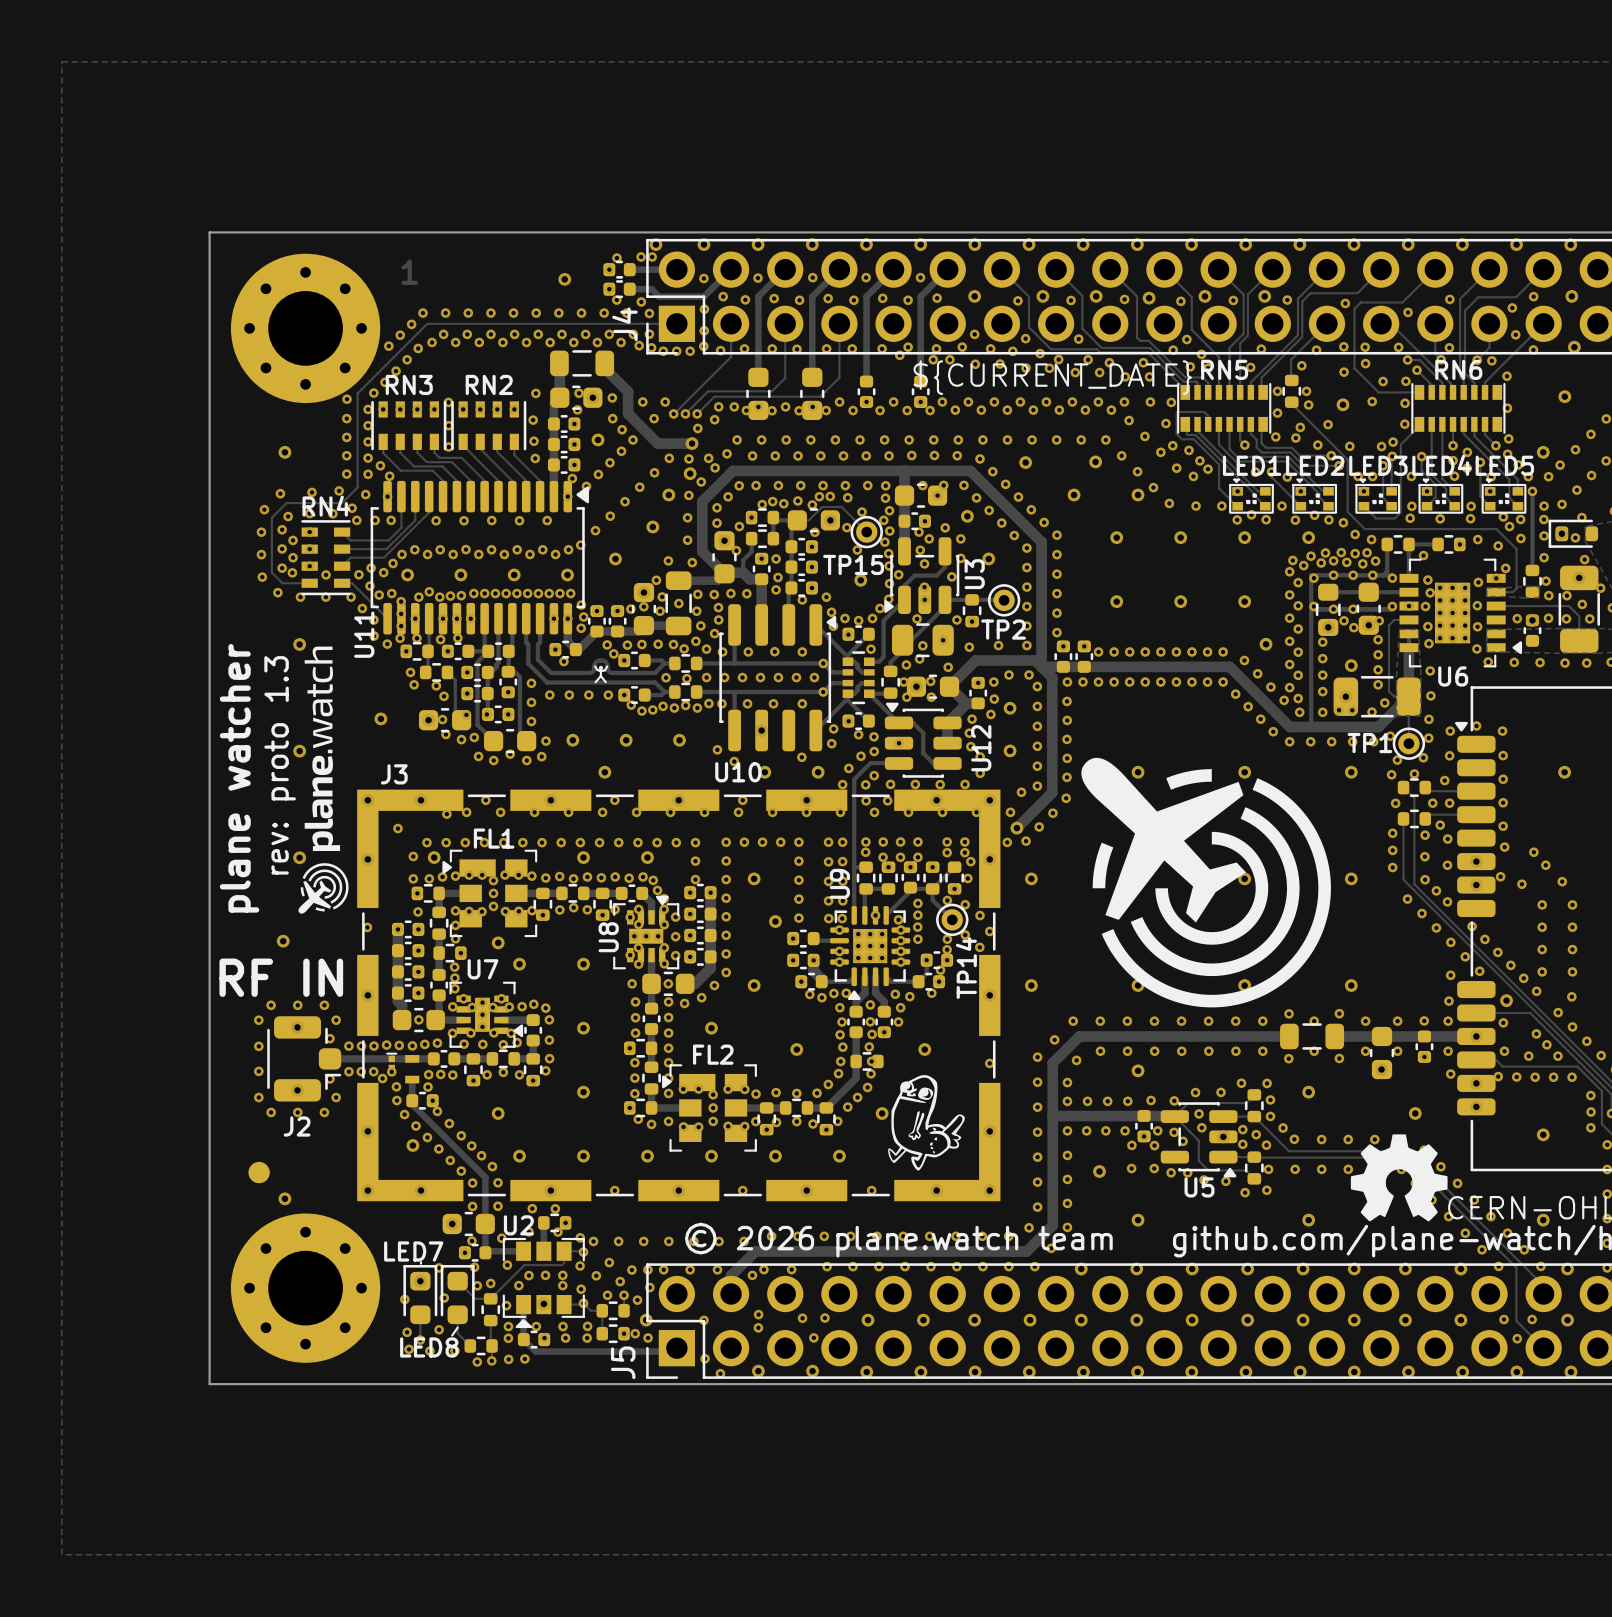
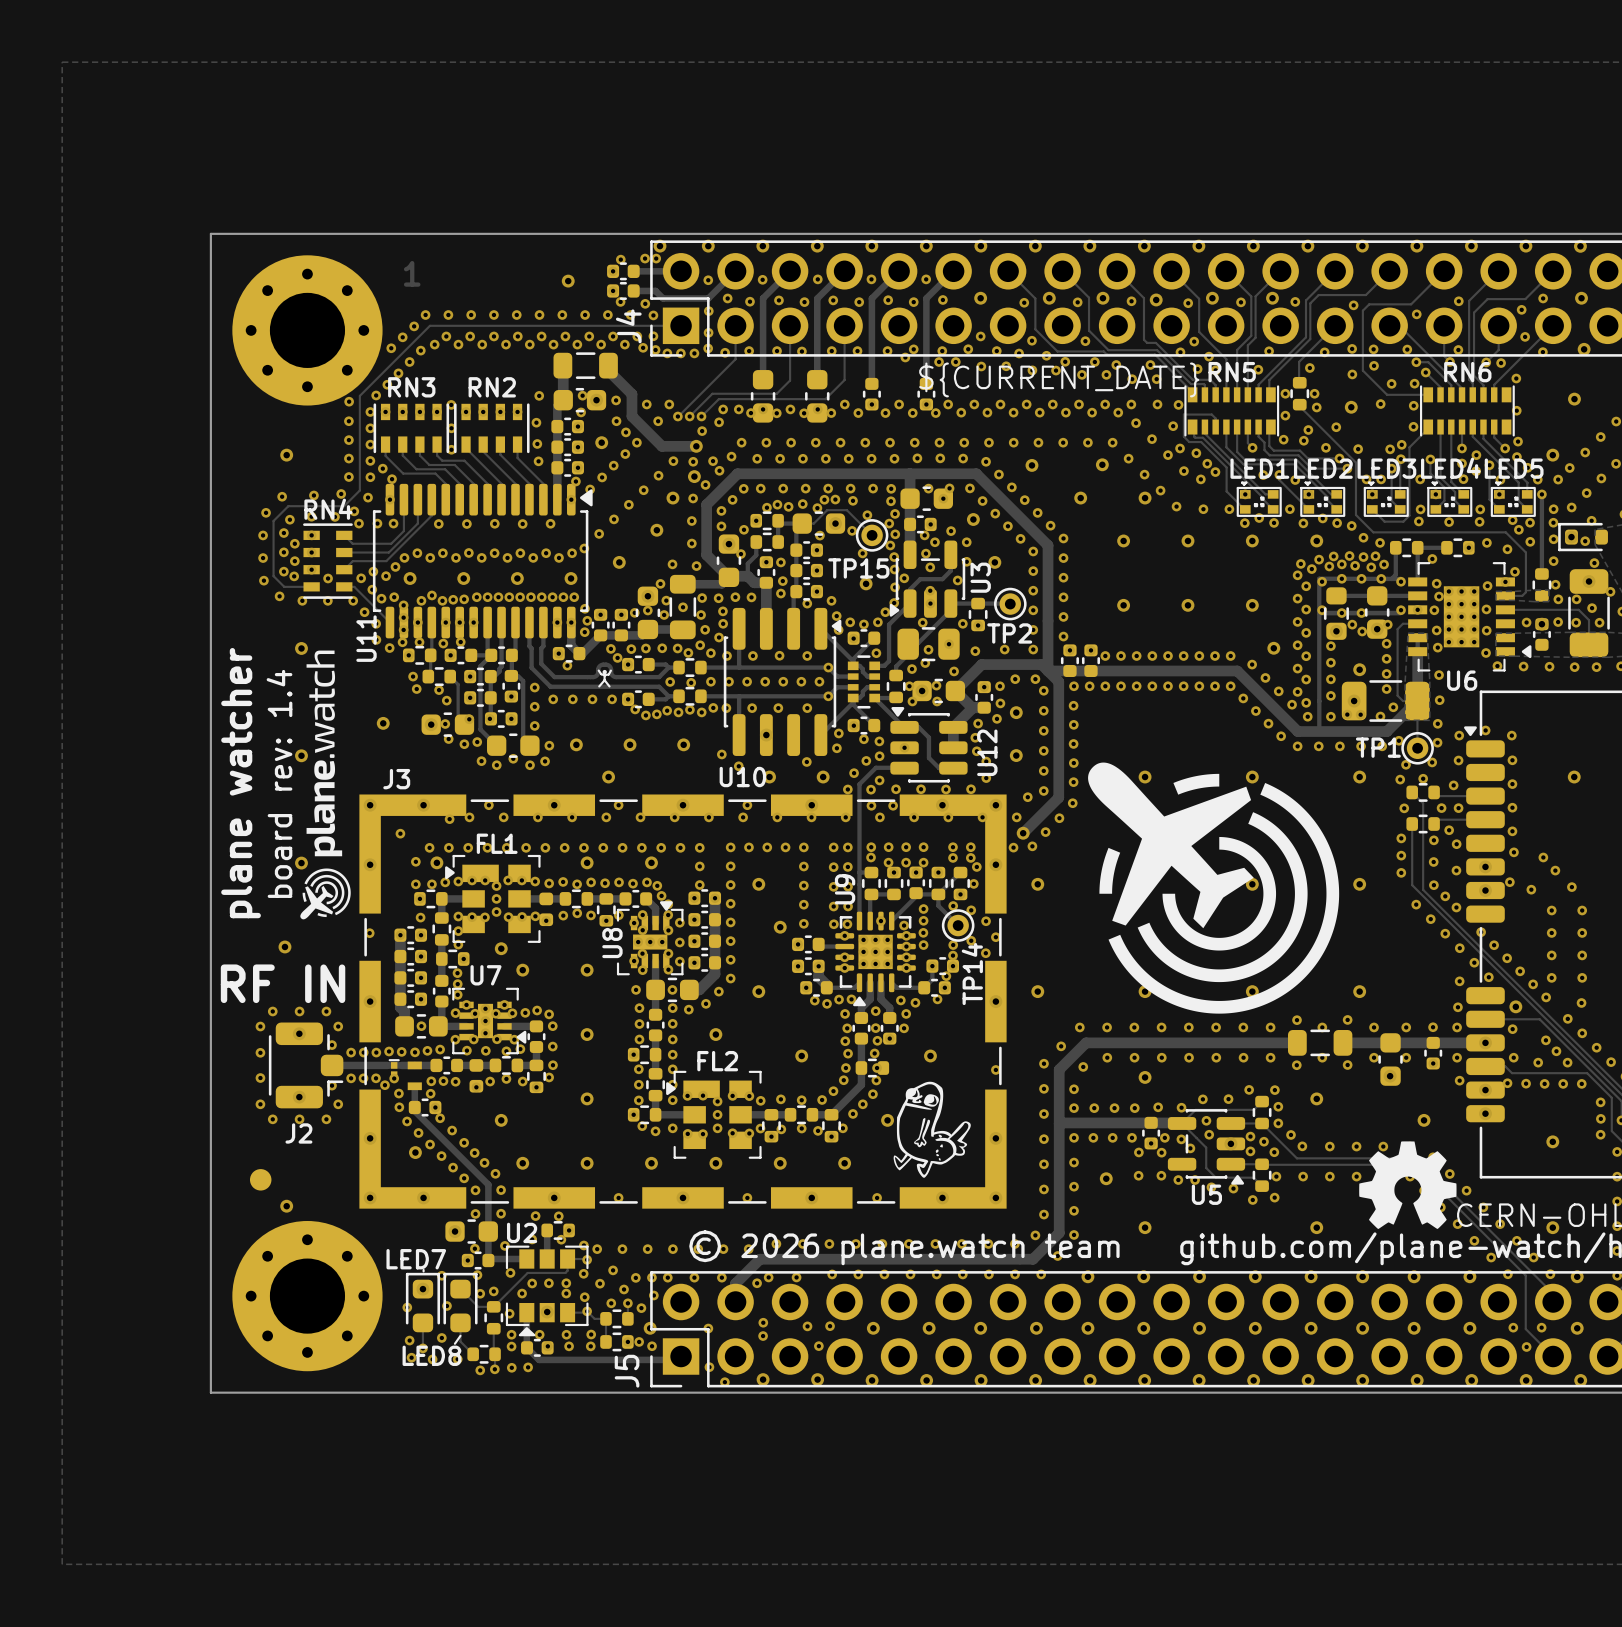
text: rev: proto 1.3 (280, 765) -> board rev: 1.4 (279, 783)
part footprint: [533, 887, 553, 921] -> [539, 892, 554, 927]
part footprint: [464, 1053, 483, 1087] -> [469, 1059, 484, 1093]

